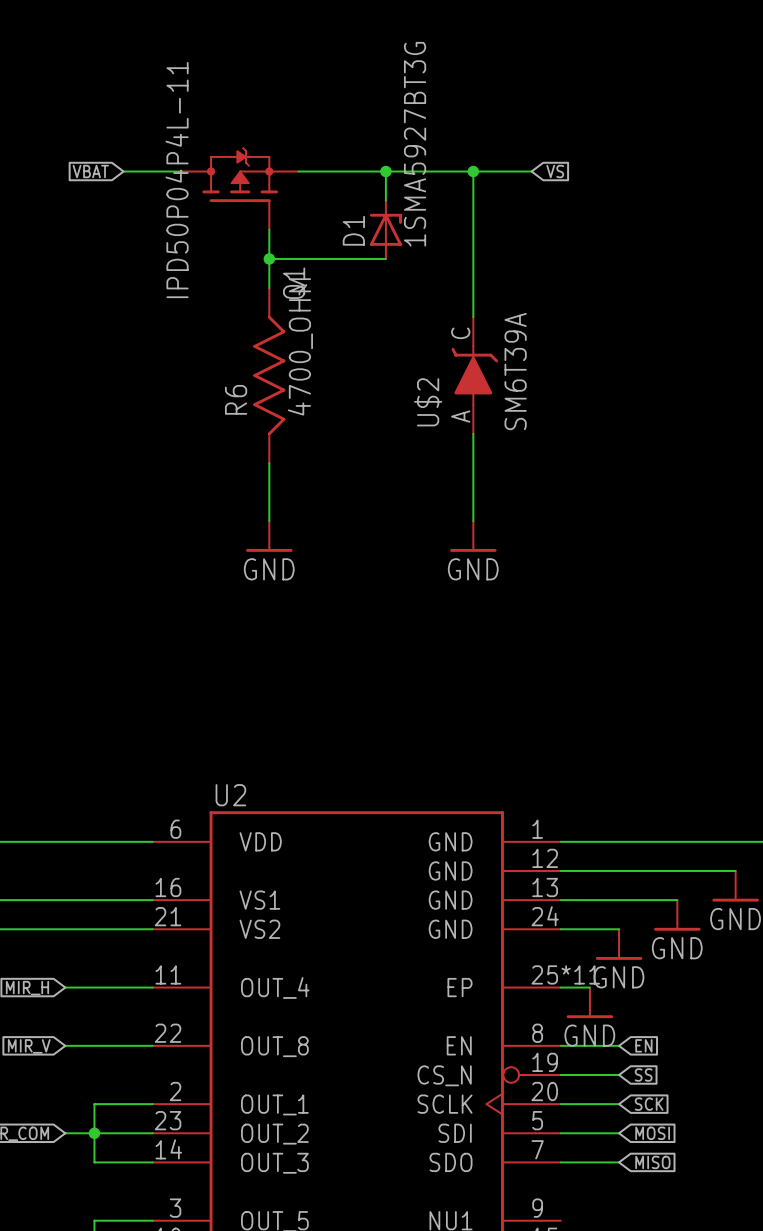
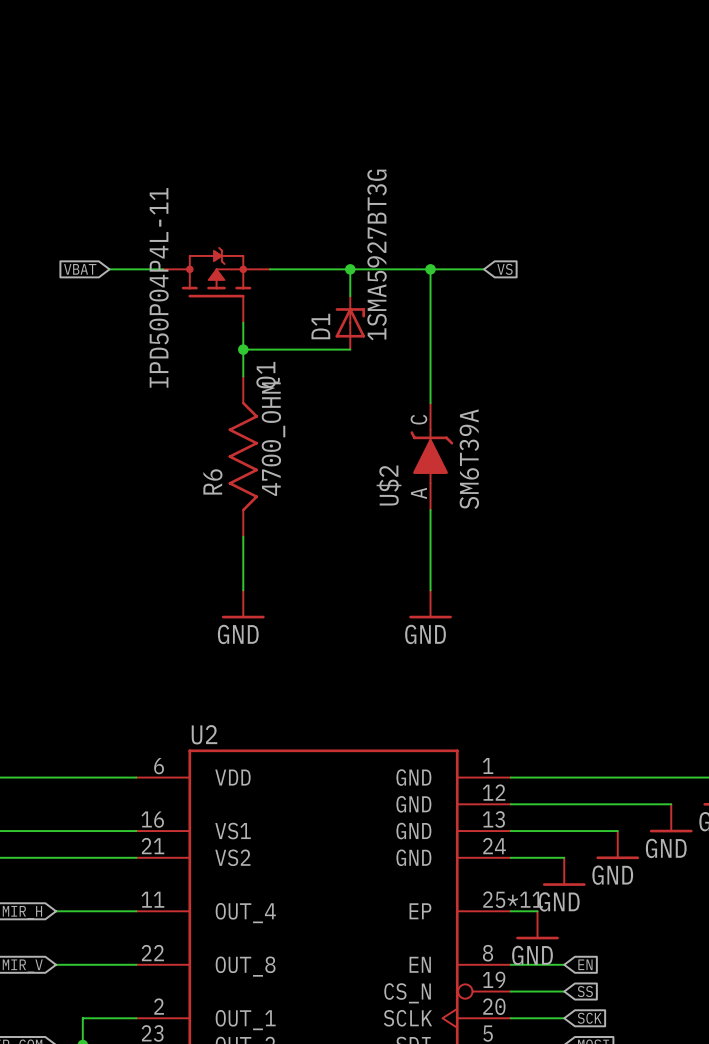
global label position: VBAT (90, 171) -> VBAT (80, 269)
wire: (123, 171) (181, 171) -> (109, 269) (163, 269)
wire: (298, 171) (531, 171) -> (270, 269) (484, 269)
wire: (385, 171) (385, 200) -> (350, 269) (350, 296)
junction: (385, 171) -> none
wire: (473, 171) (473, 288) -> none
junction: (473, 171) -> none
global label position: VS (555, 171) -> VS (504, 269)
Q1 position: (240, 188) -> (216, 285)
wire: (269, 229) (269, 288) -> (243, 322) (243, 376)
D1 position: (385, 229) -> (350, 322)
wire: (269, 258) (385, 258) -> (243, 349) (350, 349)
junction: (269, 258) -> none
junction: none -> (350, 269)
junction: none -> (430, 269)
R6 position: (269, 375) -> (243, 456)
junction: none -> (243, 349)
U$2 position: (474, 375) -> (431, 456)
wire: (269, 462) (269, 521) -> (243, 536) (243, 590)
power symbol position: GND (269, 536) -> GND (243, 604)
power symbol position: GND (473, 536) -> GND (430, 604)
wire: none -> (430, 510) (430, 590)

